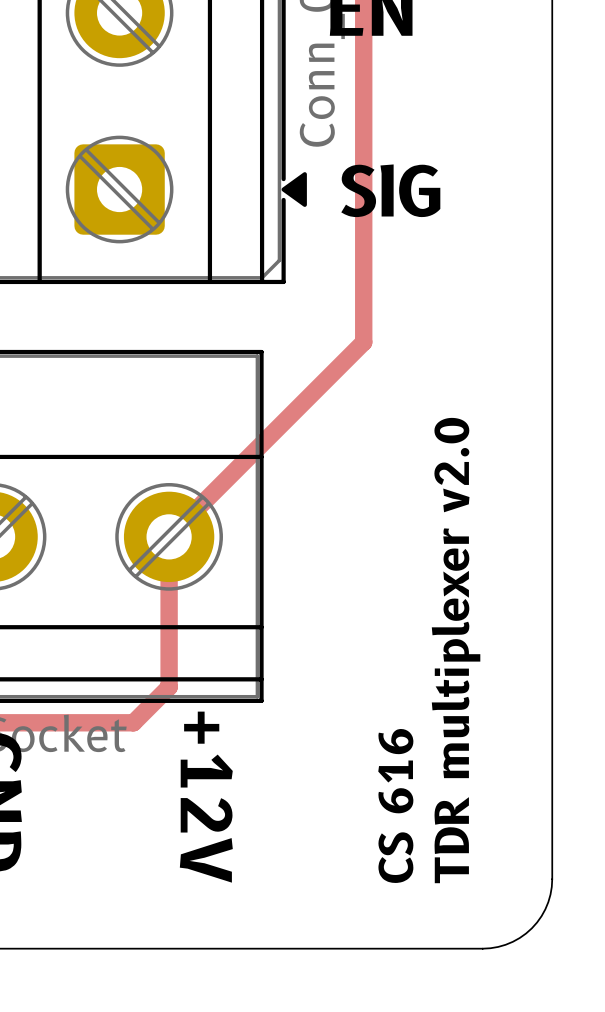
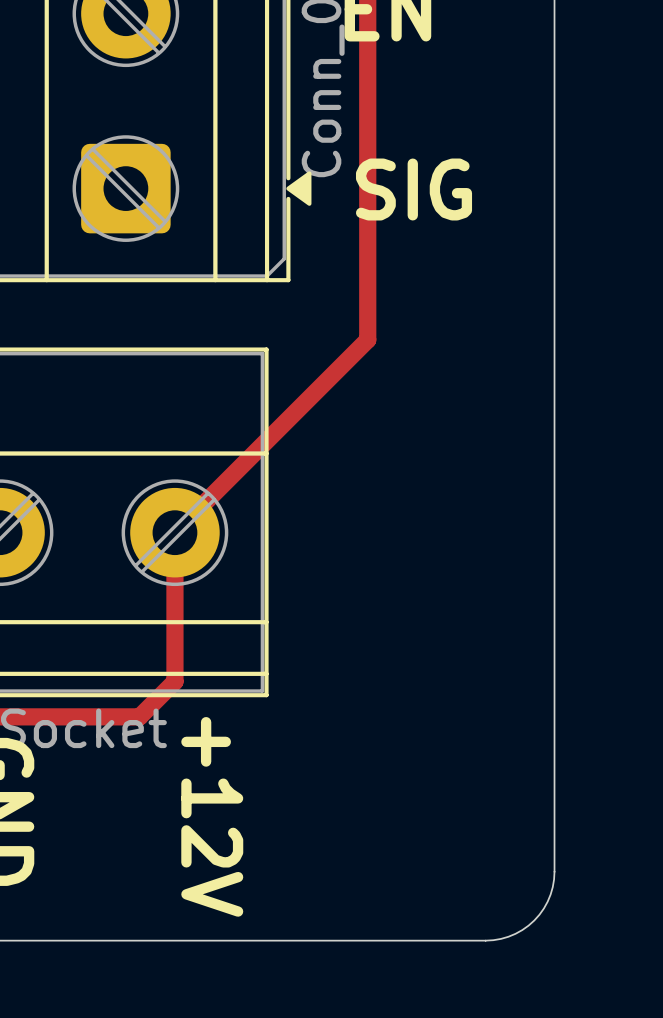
text: TDR multiplexer v2.0 (456, 650) -> none
text: CS 616 (395, 805) -> none

